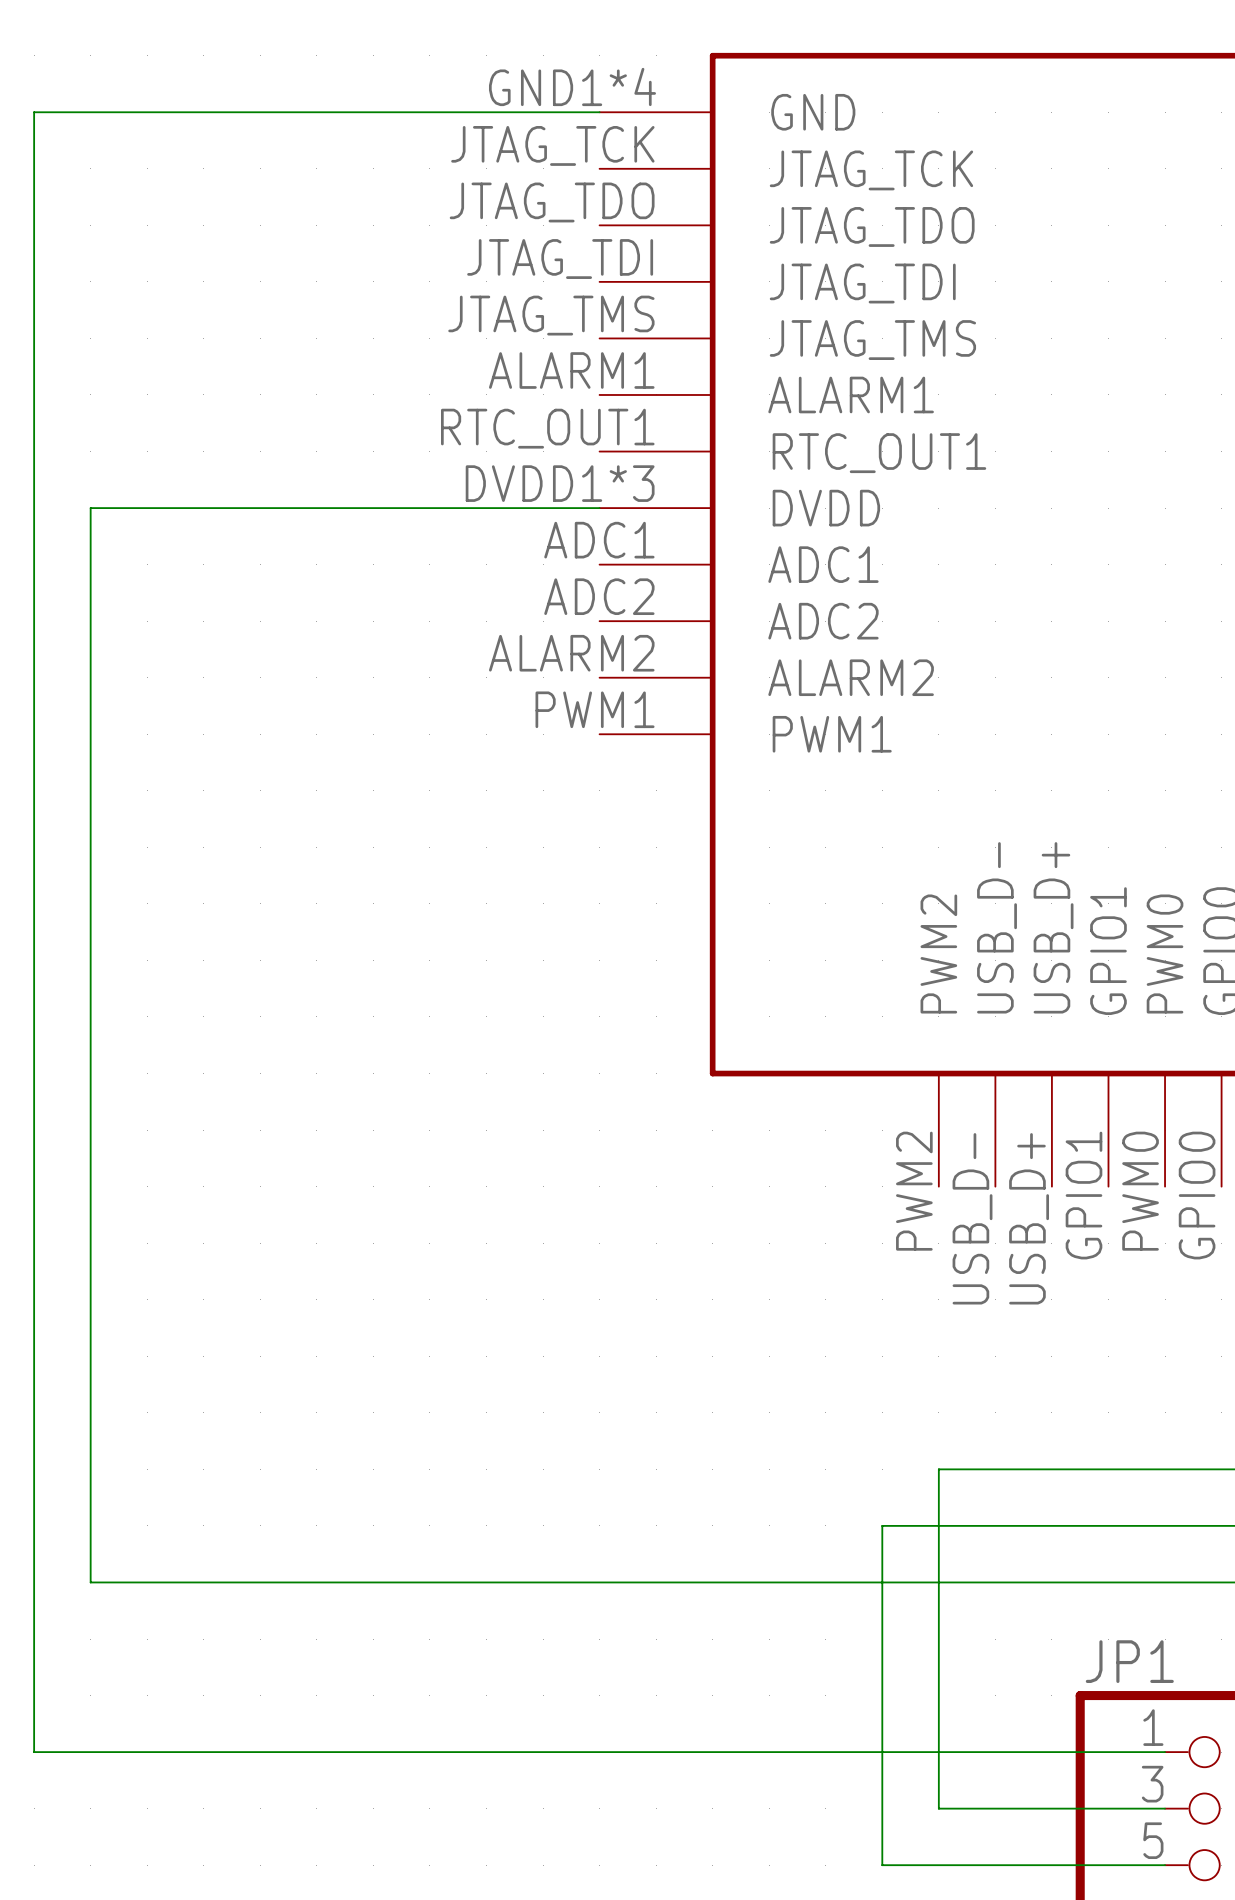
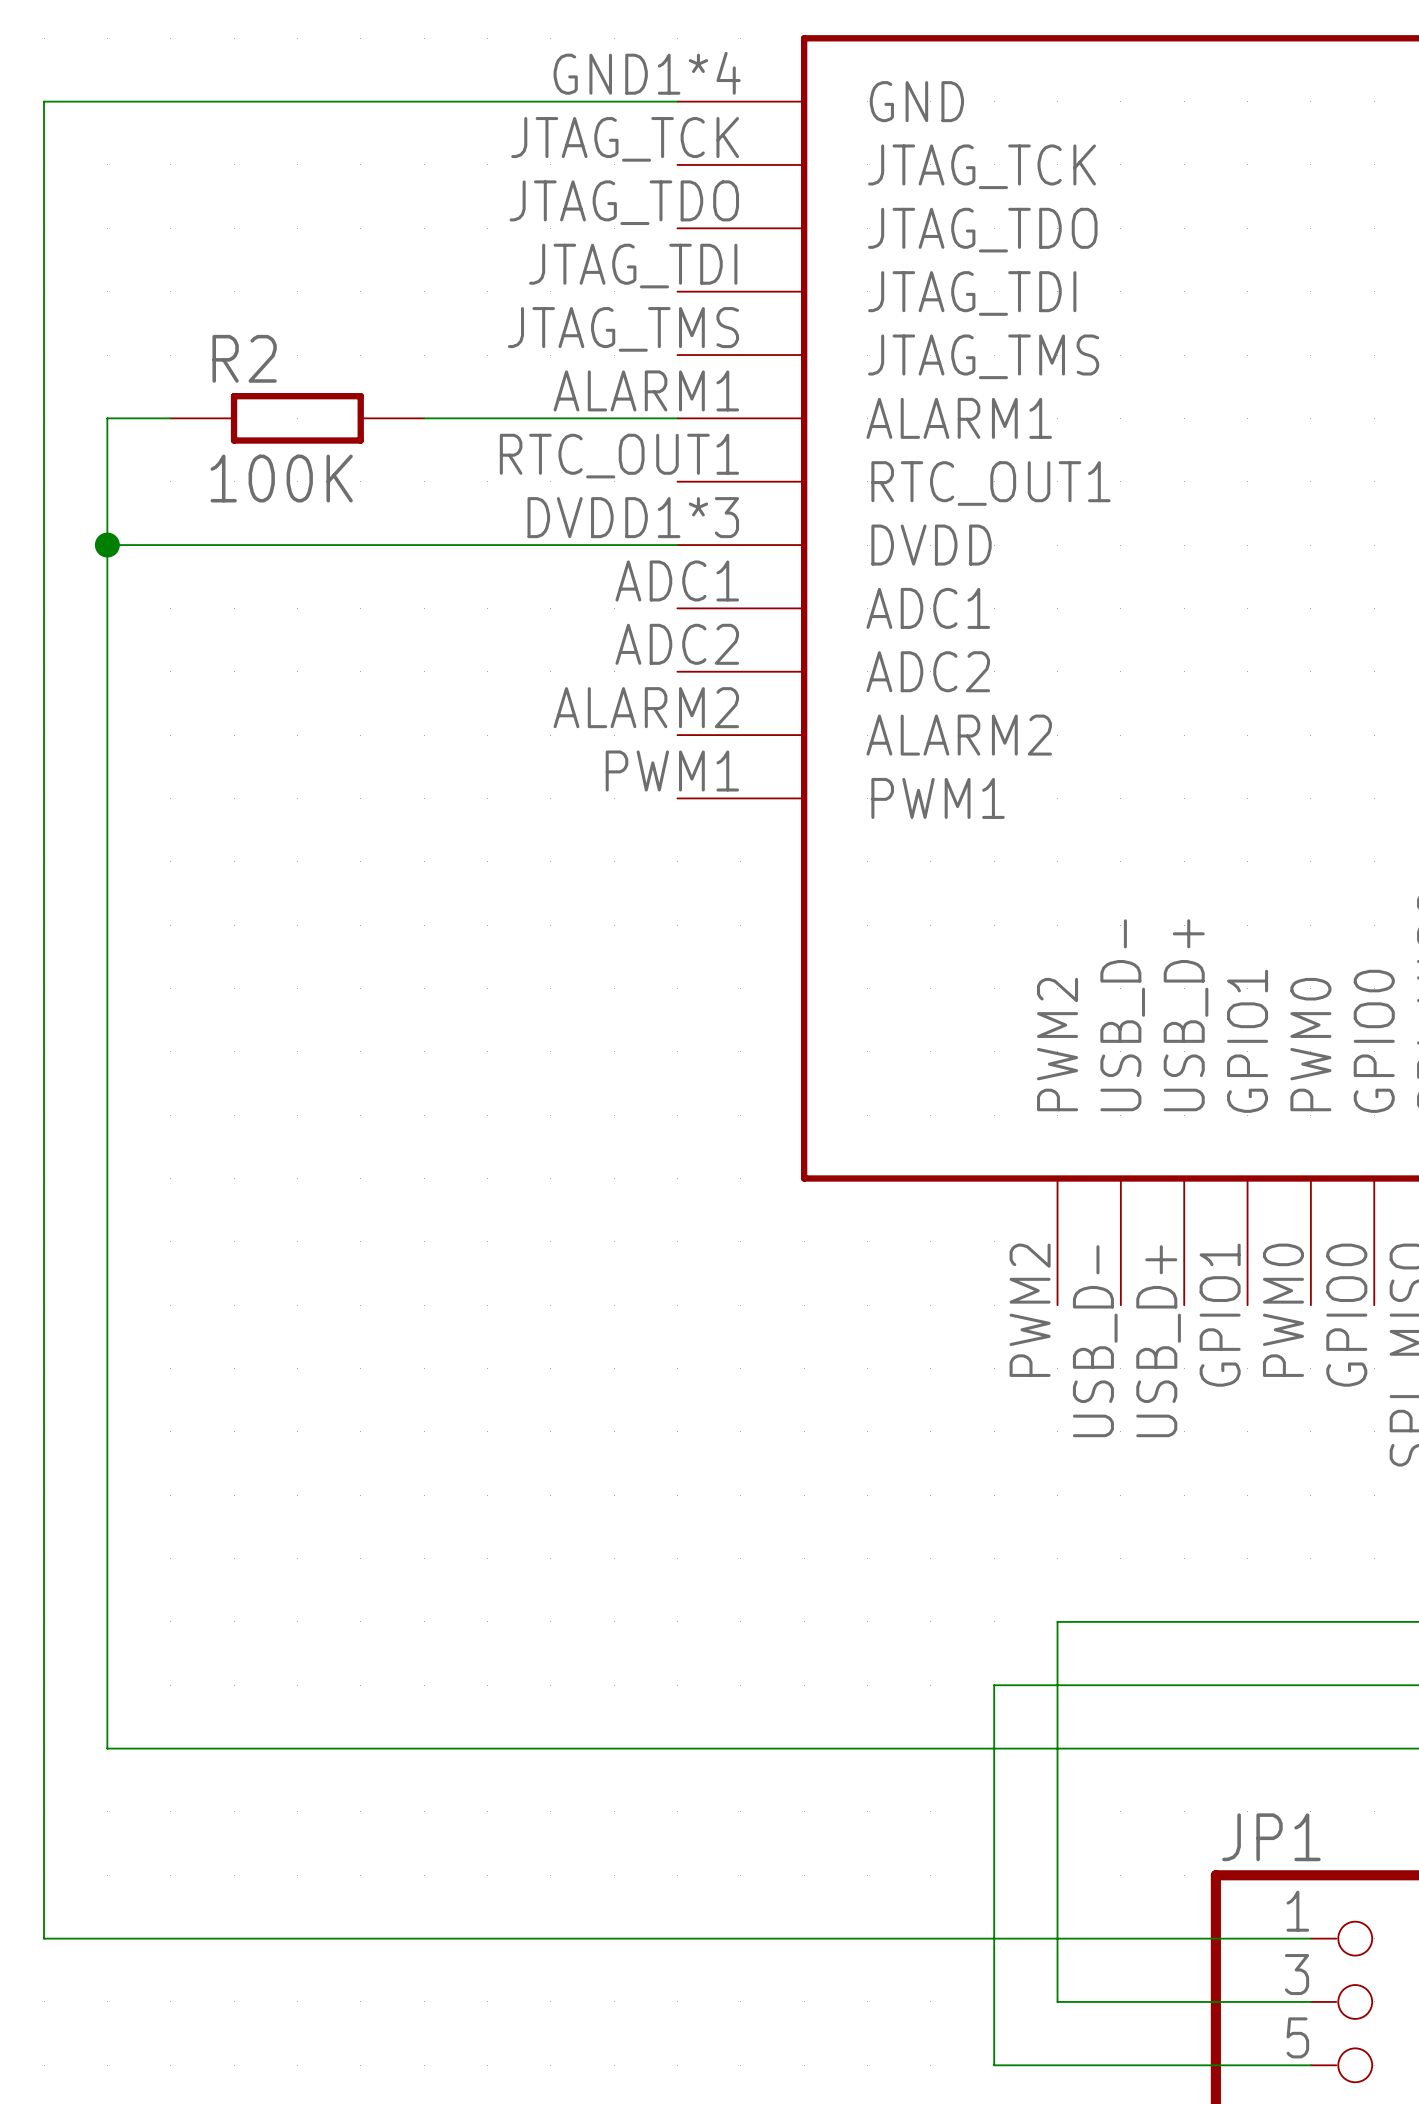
wire: none -> (170, 418) (107, 418) (107, 545)
R2: none -> 100K (297, 418)
wire: none -> (424, 418) (677, 418)
junction: none -> (107, 545)

